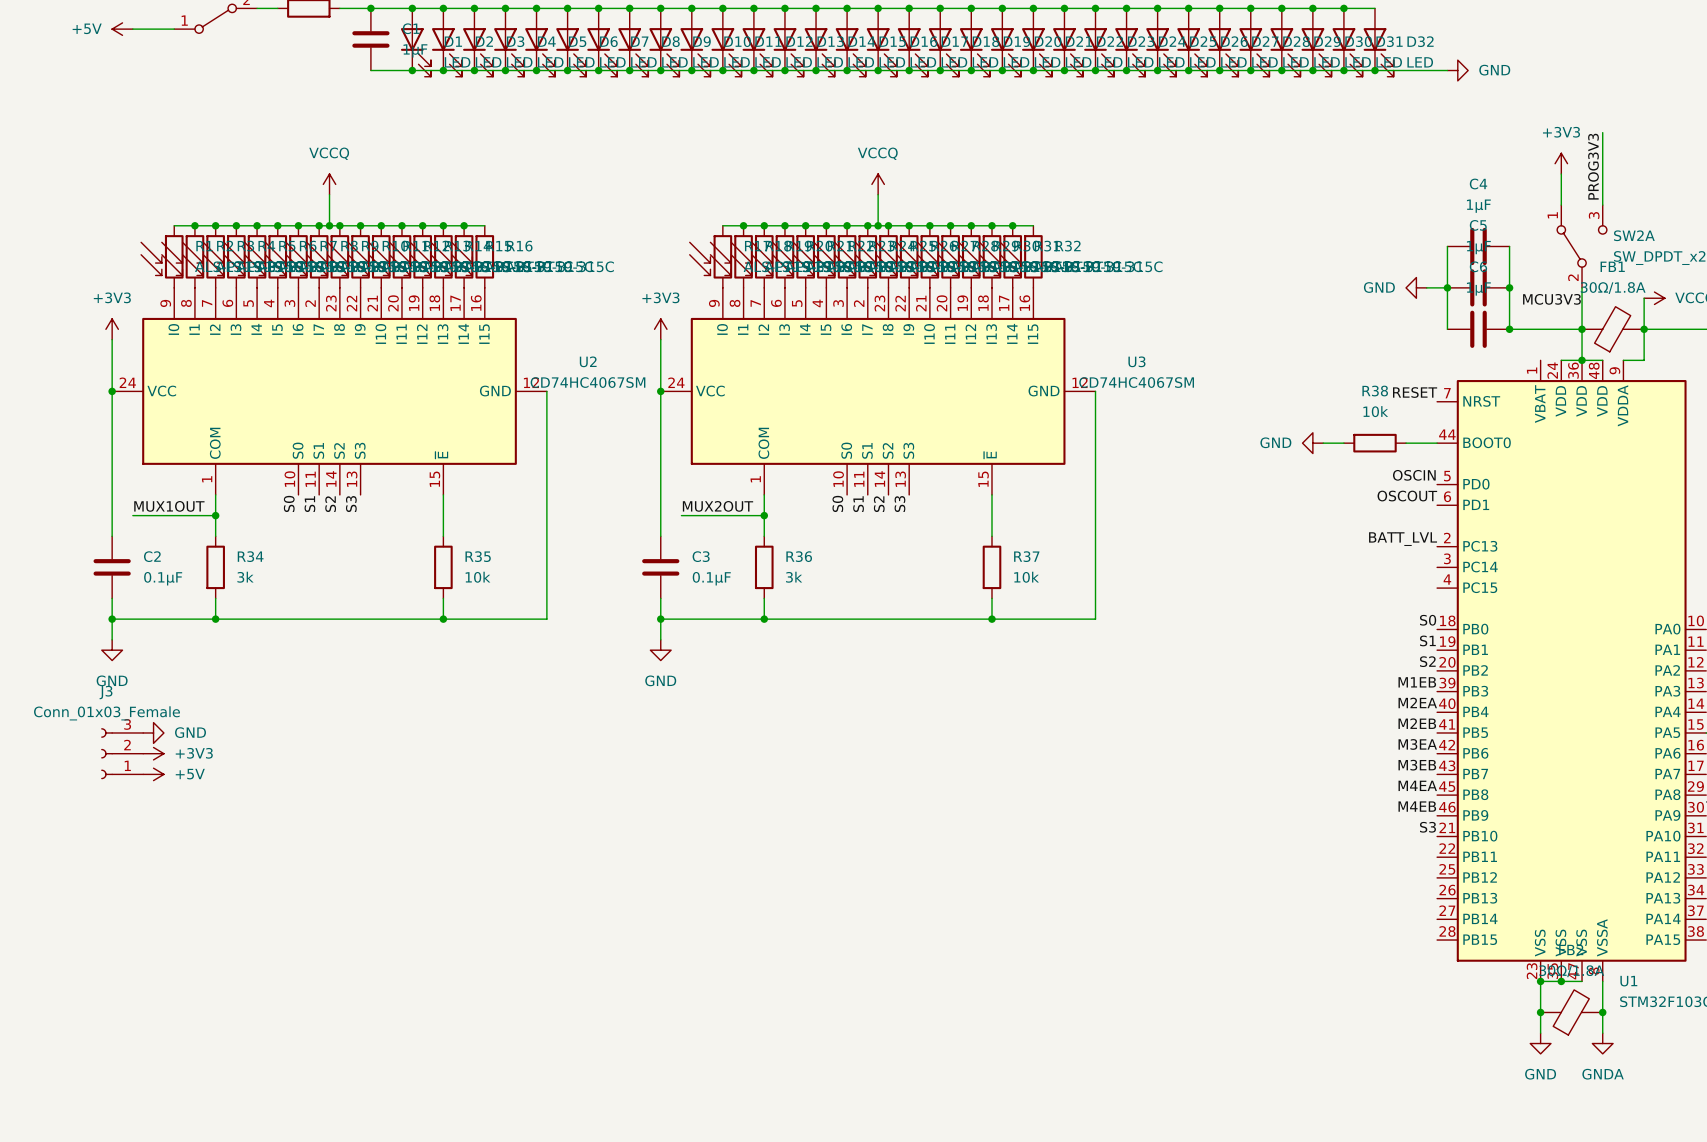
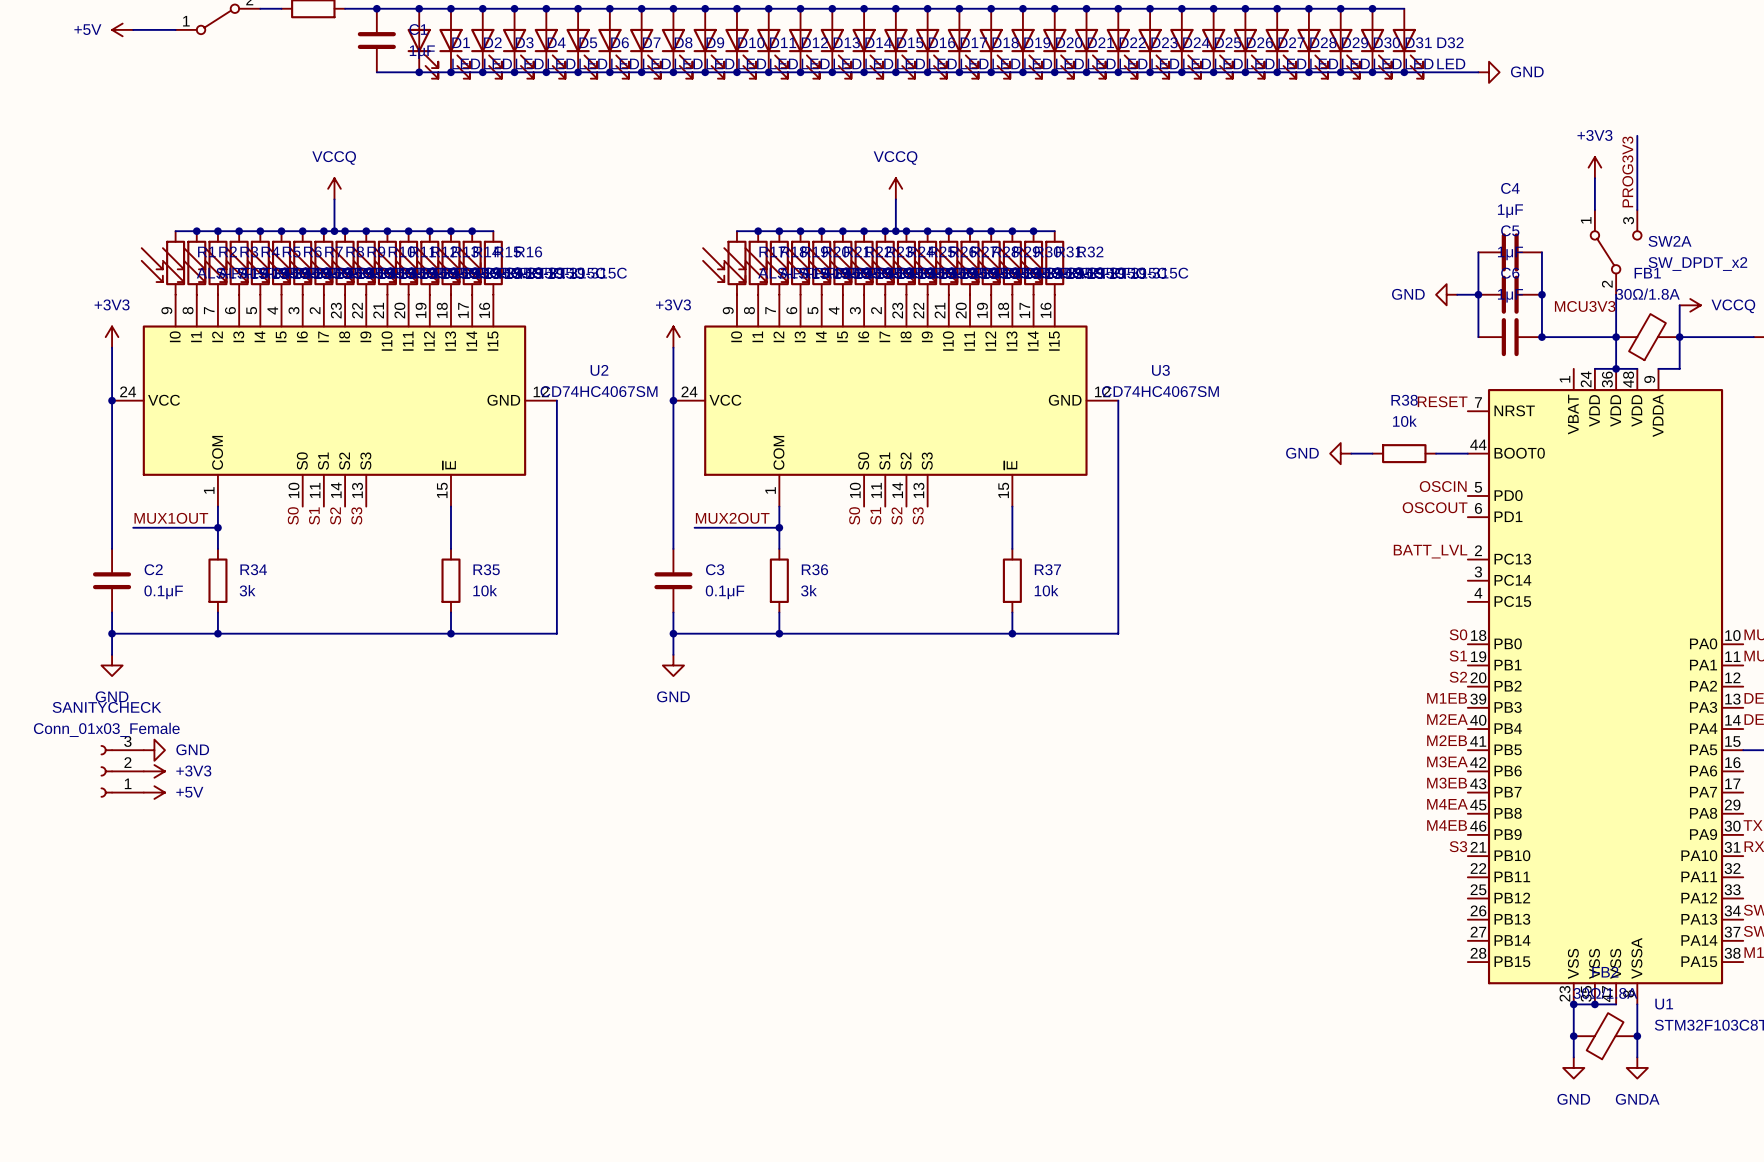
J3 name: J3 (106, 692) -> SANITYCHECK (107, 707)

